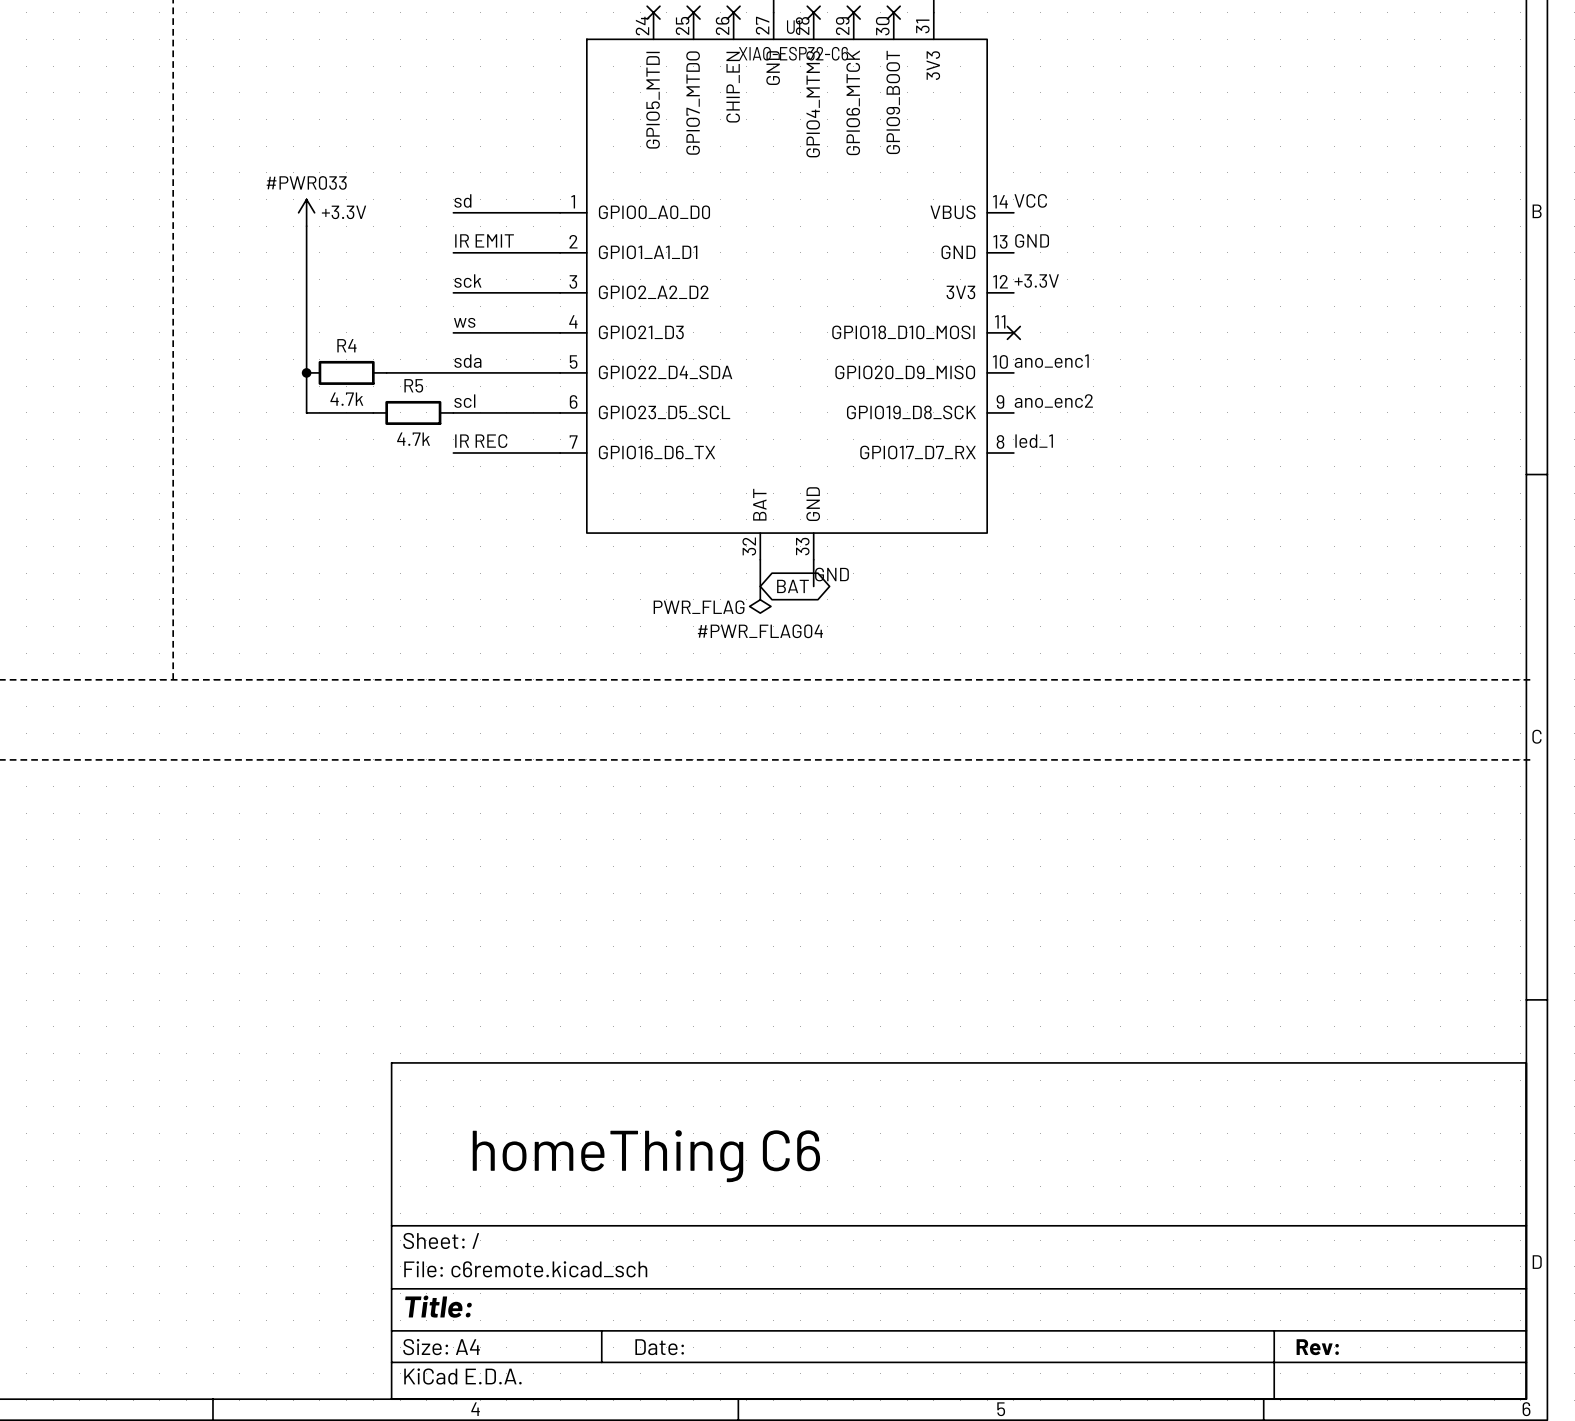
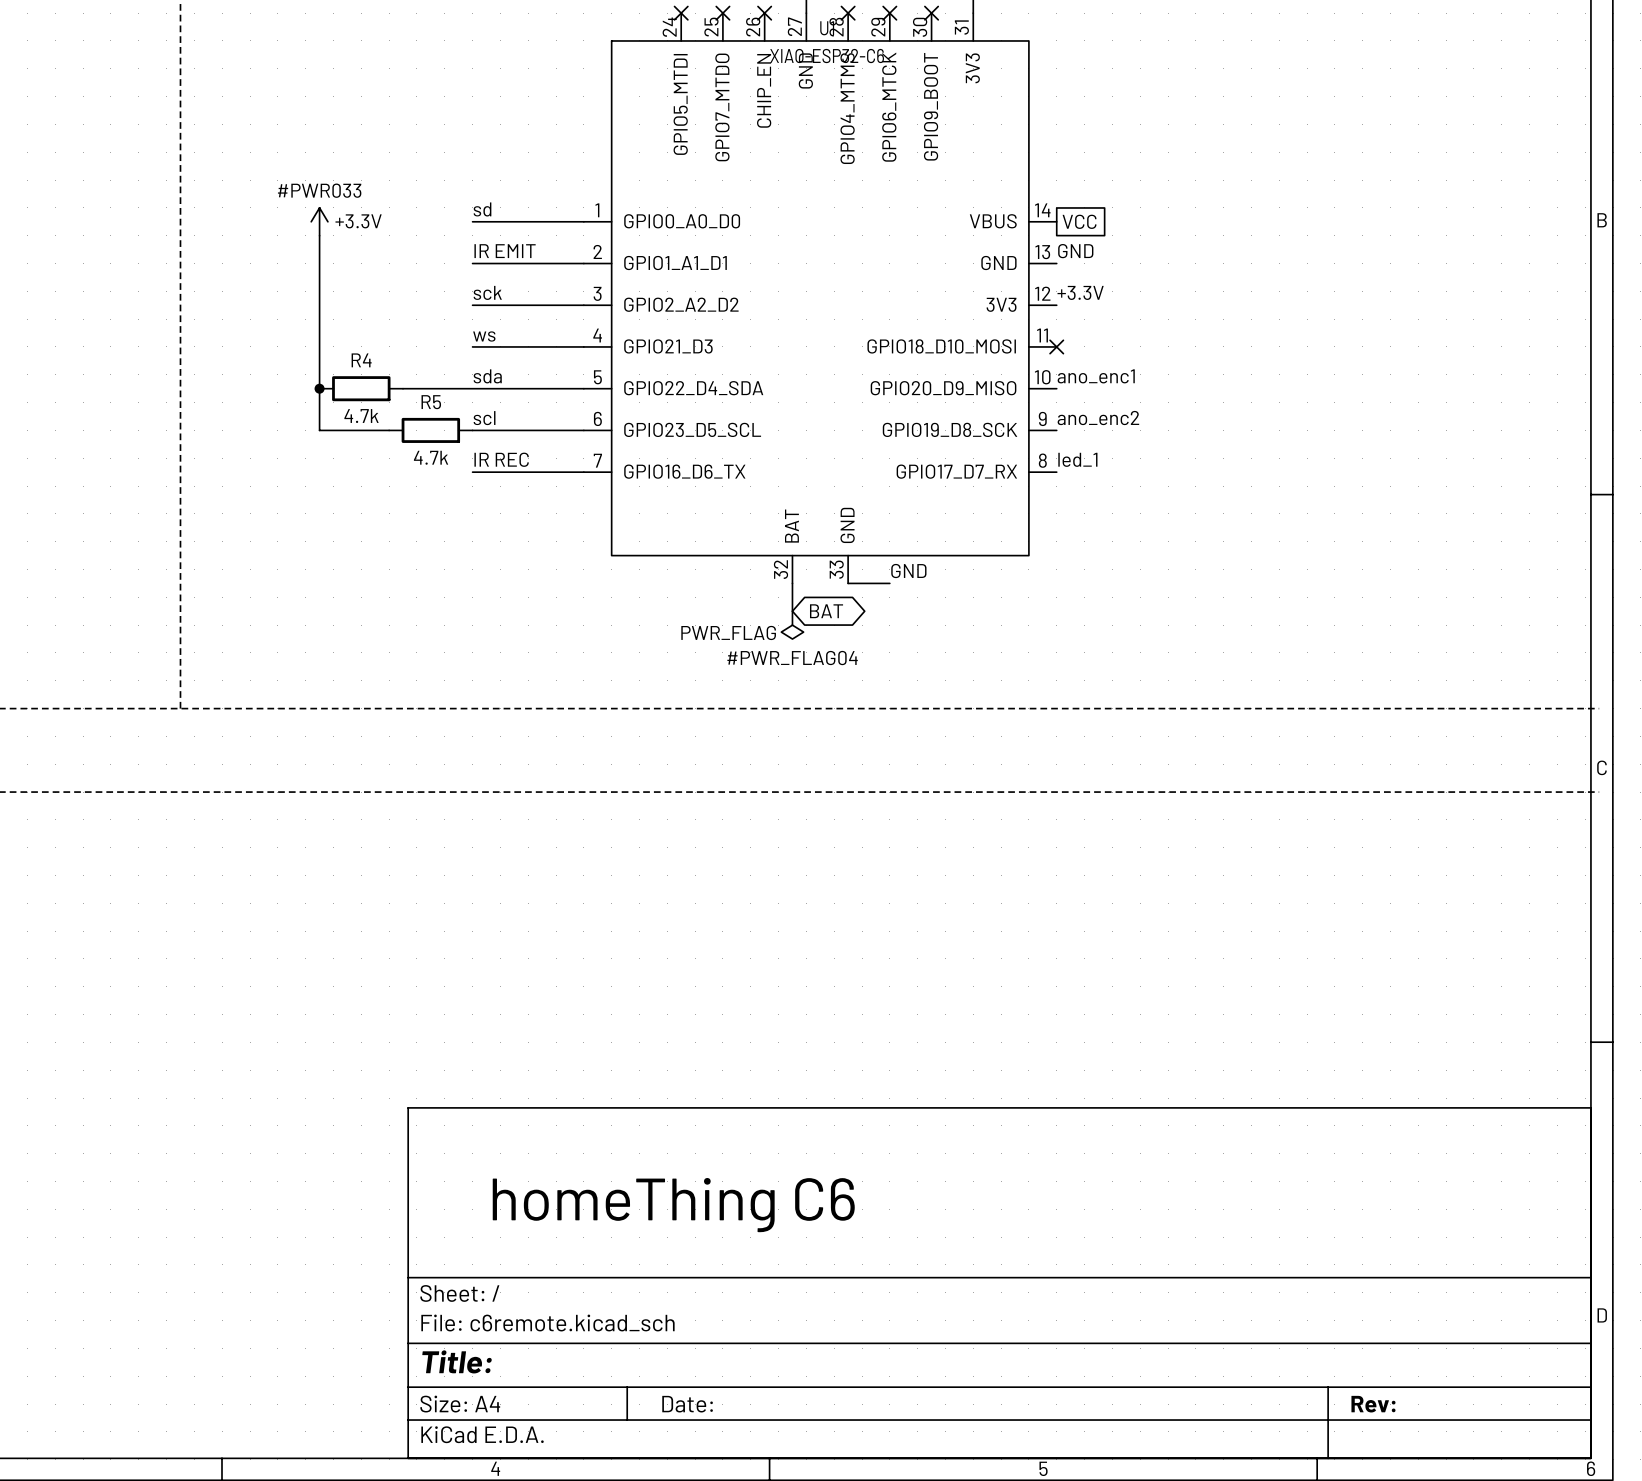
label: VCC (1030, 200) -> none
global label: none -> VCC (1079, 221)
wire: (813, 559) (813, 586) -> (848, 583) (889, 583)
label position: GND (831, 574) -> GND (908, 571)

